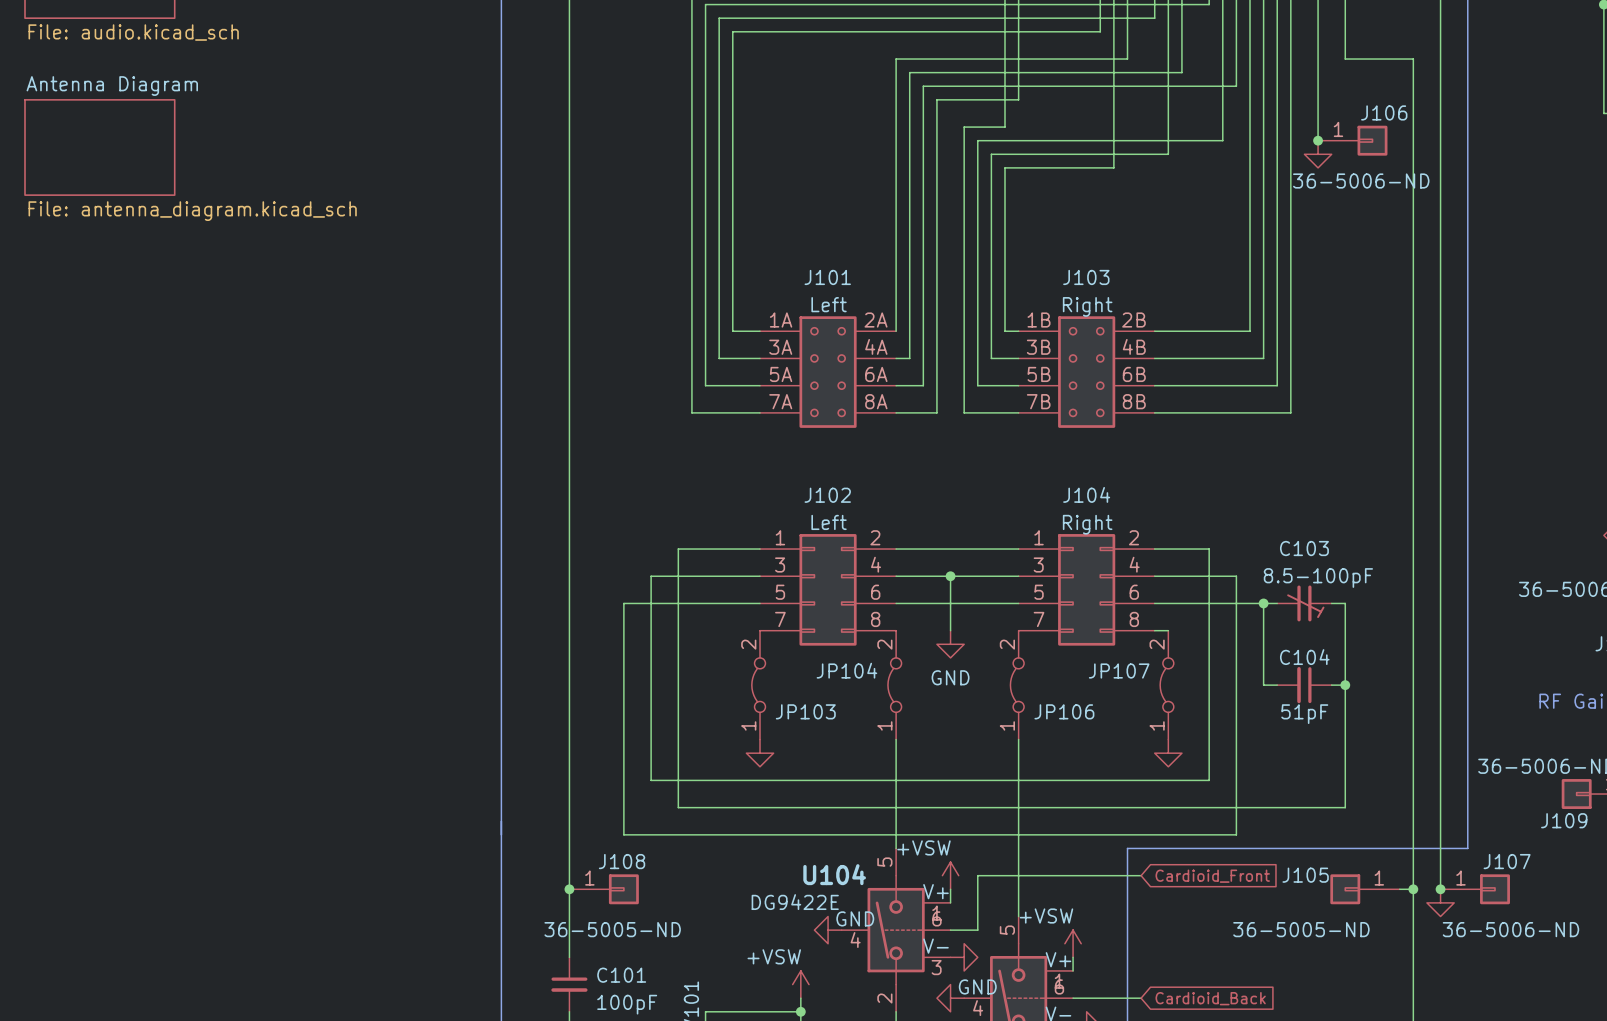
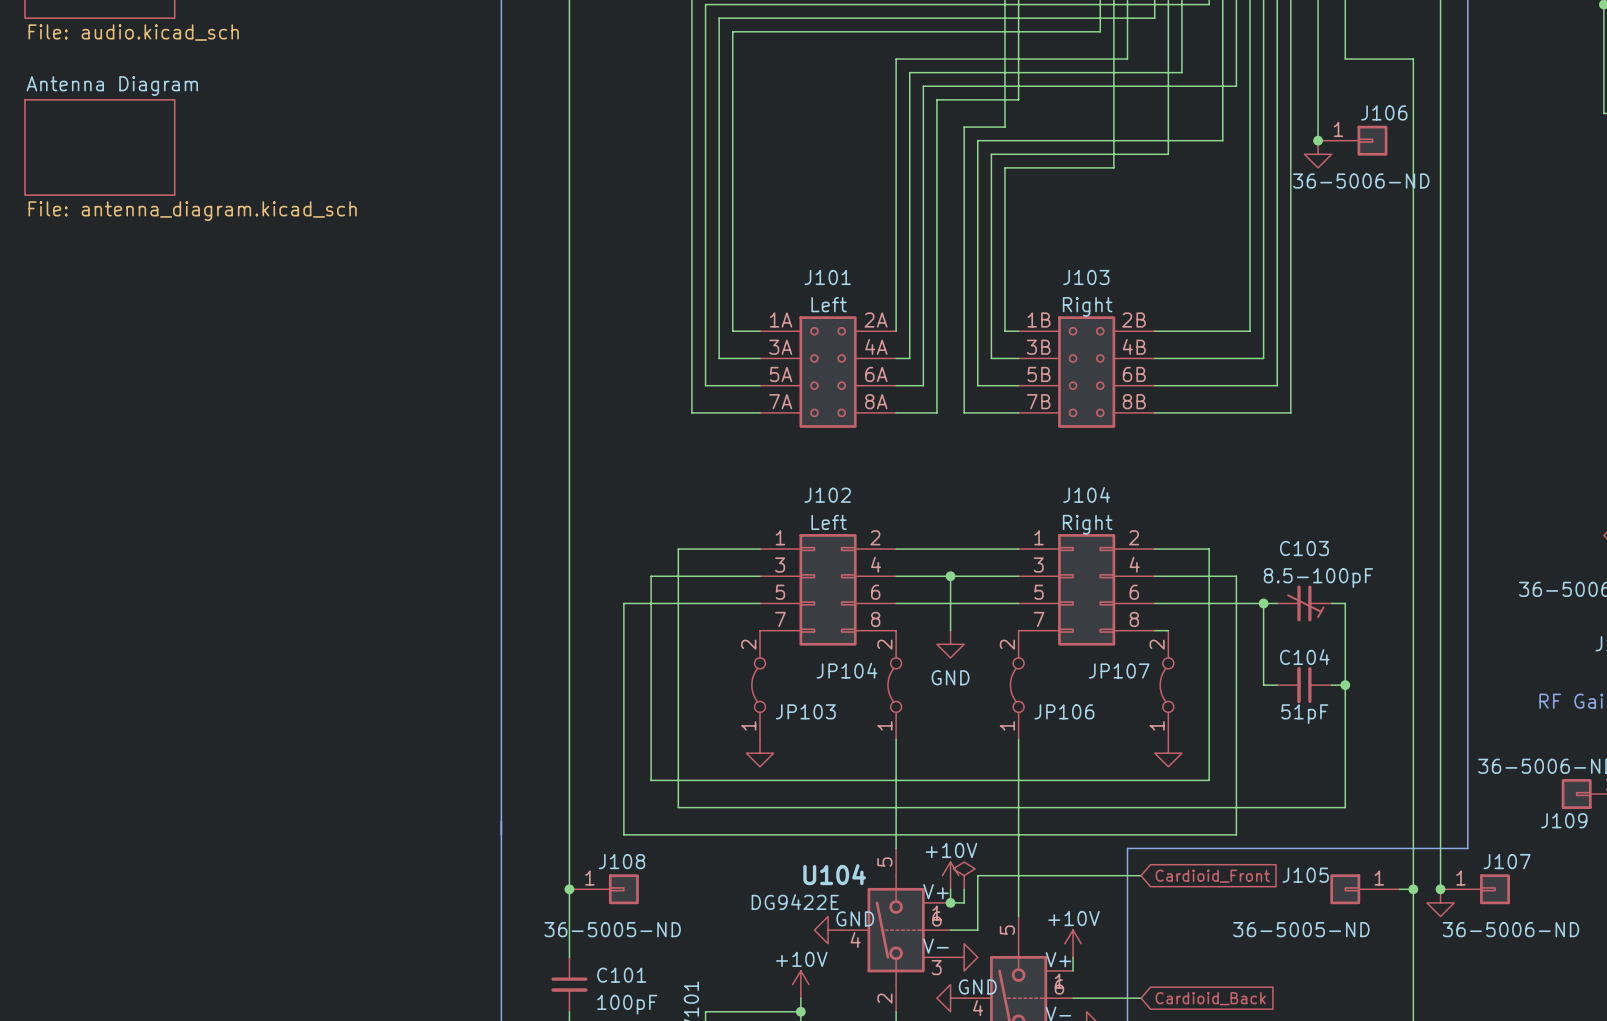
power symbol: +VSW (950, 875) -> +10V (950, 875)
power symbol: none -> (964, 875)
wire: none -> (964, 889) (964, 902) (950, 902)
junction: none -> (950, 902)
power symbol: +VSW (1073, 943) -> +10V (1073, 943)
power symbol: +VSW (800, 984) -> +10V (800, 984)

